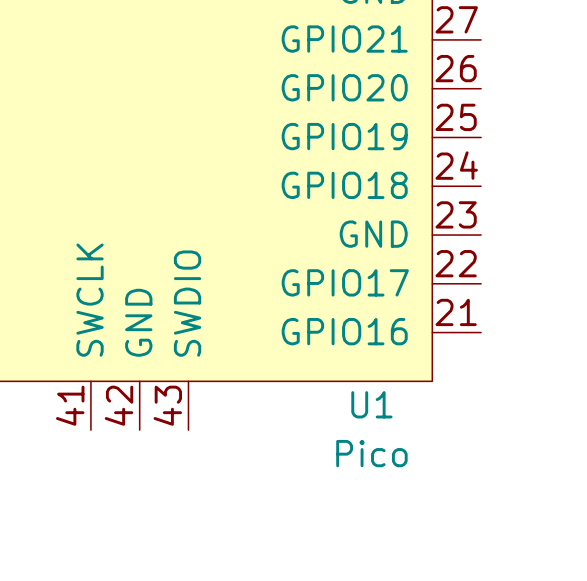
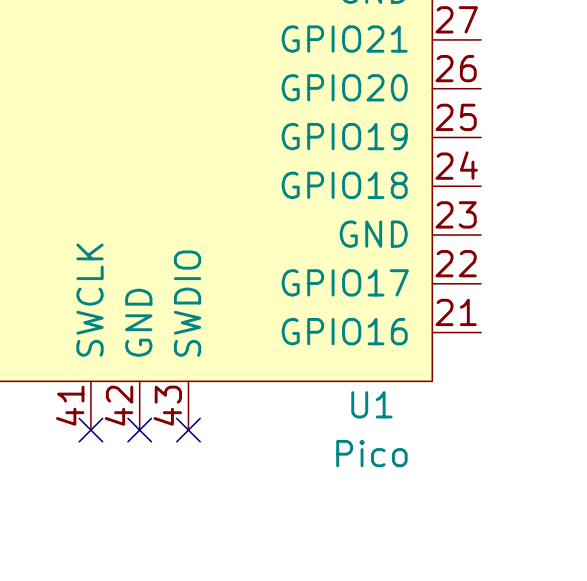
no-connect mark: none -> (90, 430)
no-connect mark: none -> (139, 430)
no-connect mark: none -> (188, 430)

